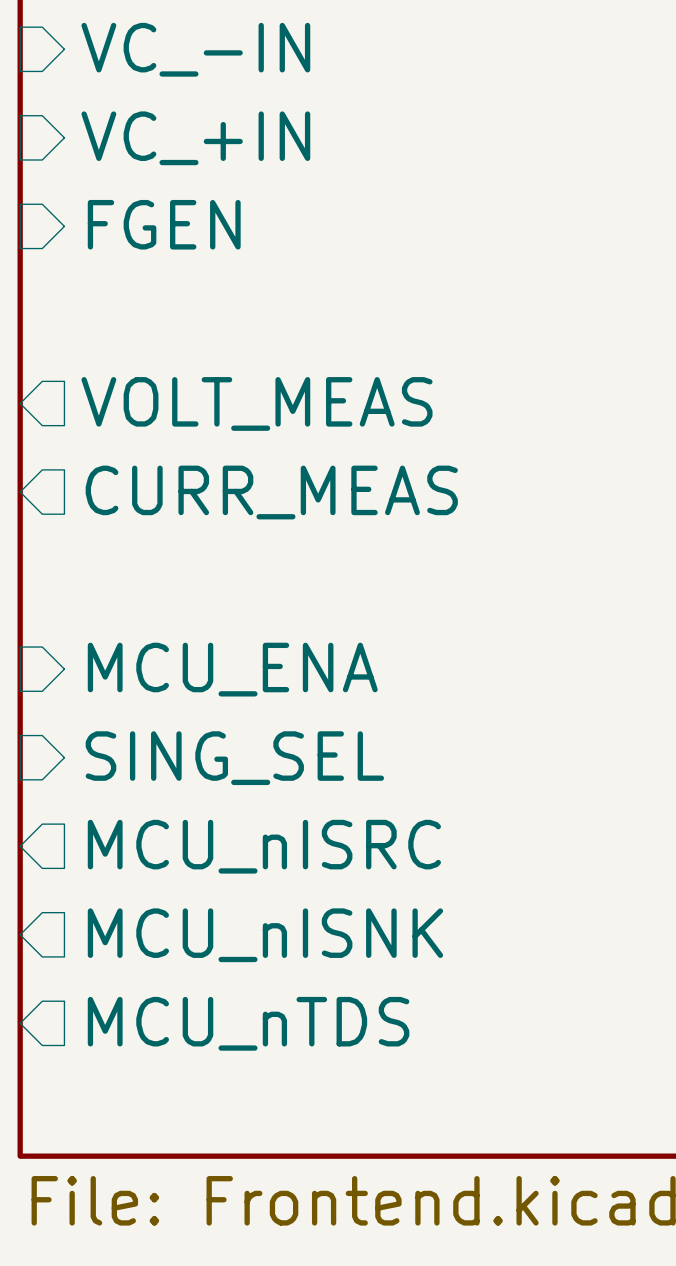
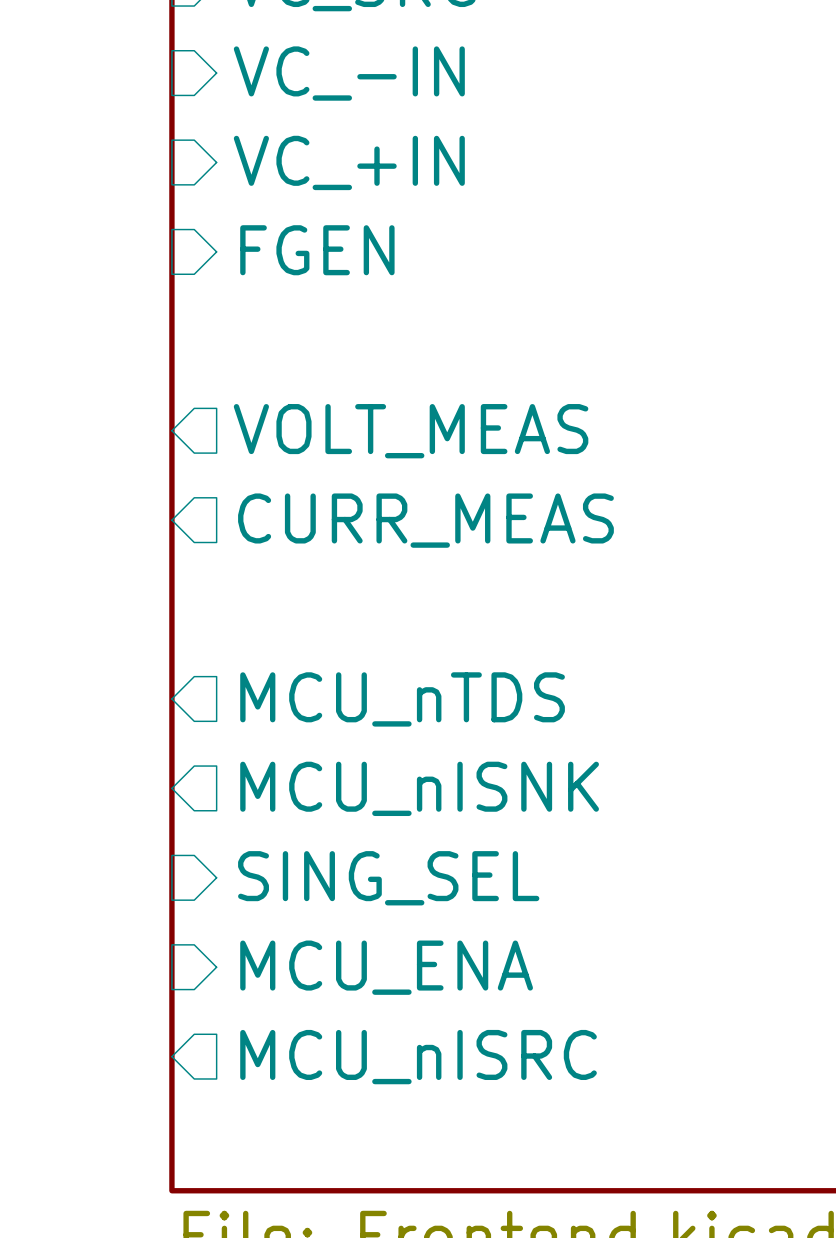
sheet pin shape: input (232, 669) -> output (402, 699)
sheet pin: MCU_ENA (232, 669) -> MCU_nTDS (402, 699)
sheet pin shape: input (234, 758) -> output (419, 788)
sheet pin: SING_SEL (234, 758) -> MCU_nISNK (419, 788)
sheet pin shape: output (264, 846) -> input (388, 878)
sheet pin: MCU_nISRC (264, 846) -> SING_SEL (388, 878)
sheet pin shape: output (265, 935) -> input (386, 967)
sheet pin: MCU_nISNK (265, 935) -> MCU_ENA (386, 967)
sheet pin: MCU_nTDS (248, 1023) -> MCU_nISRC (418, 1057)

